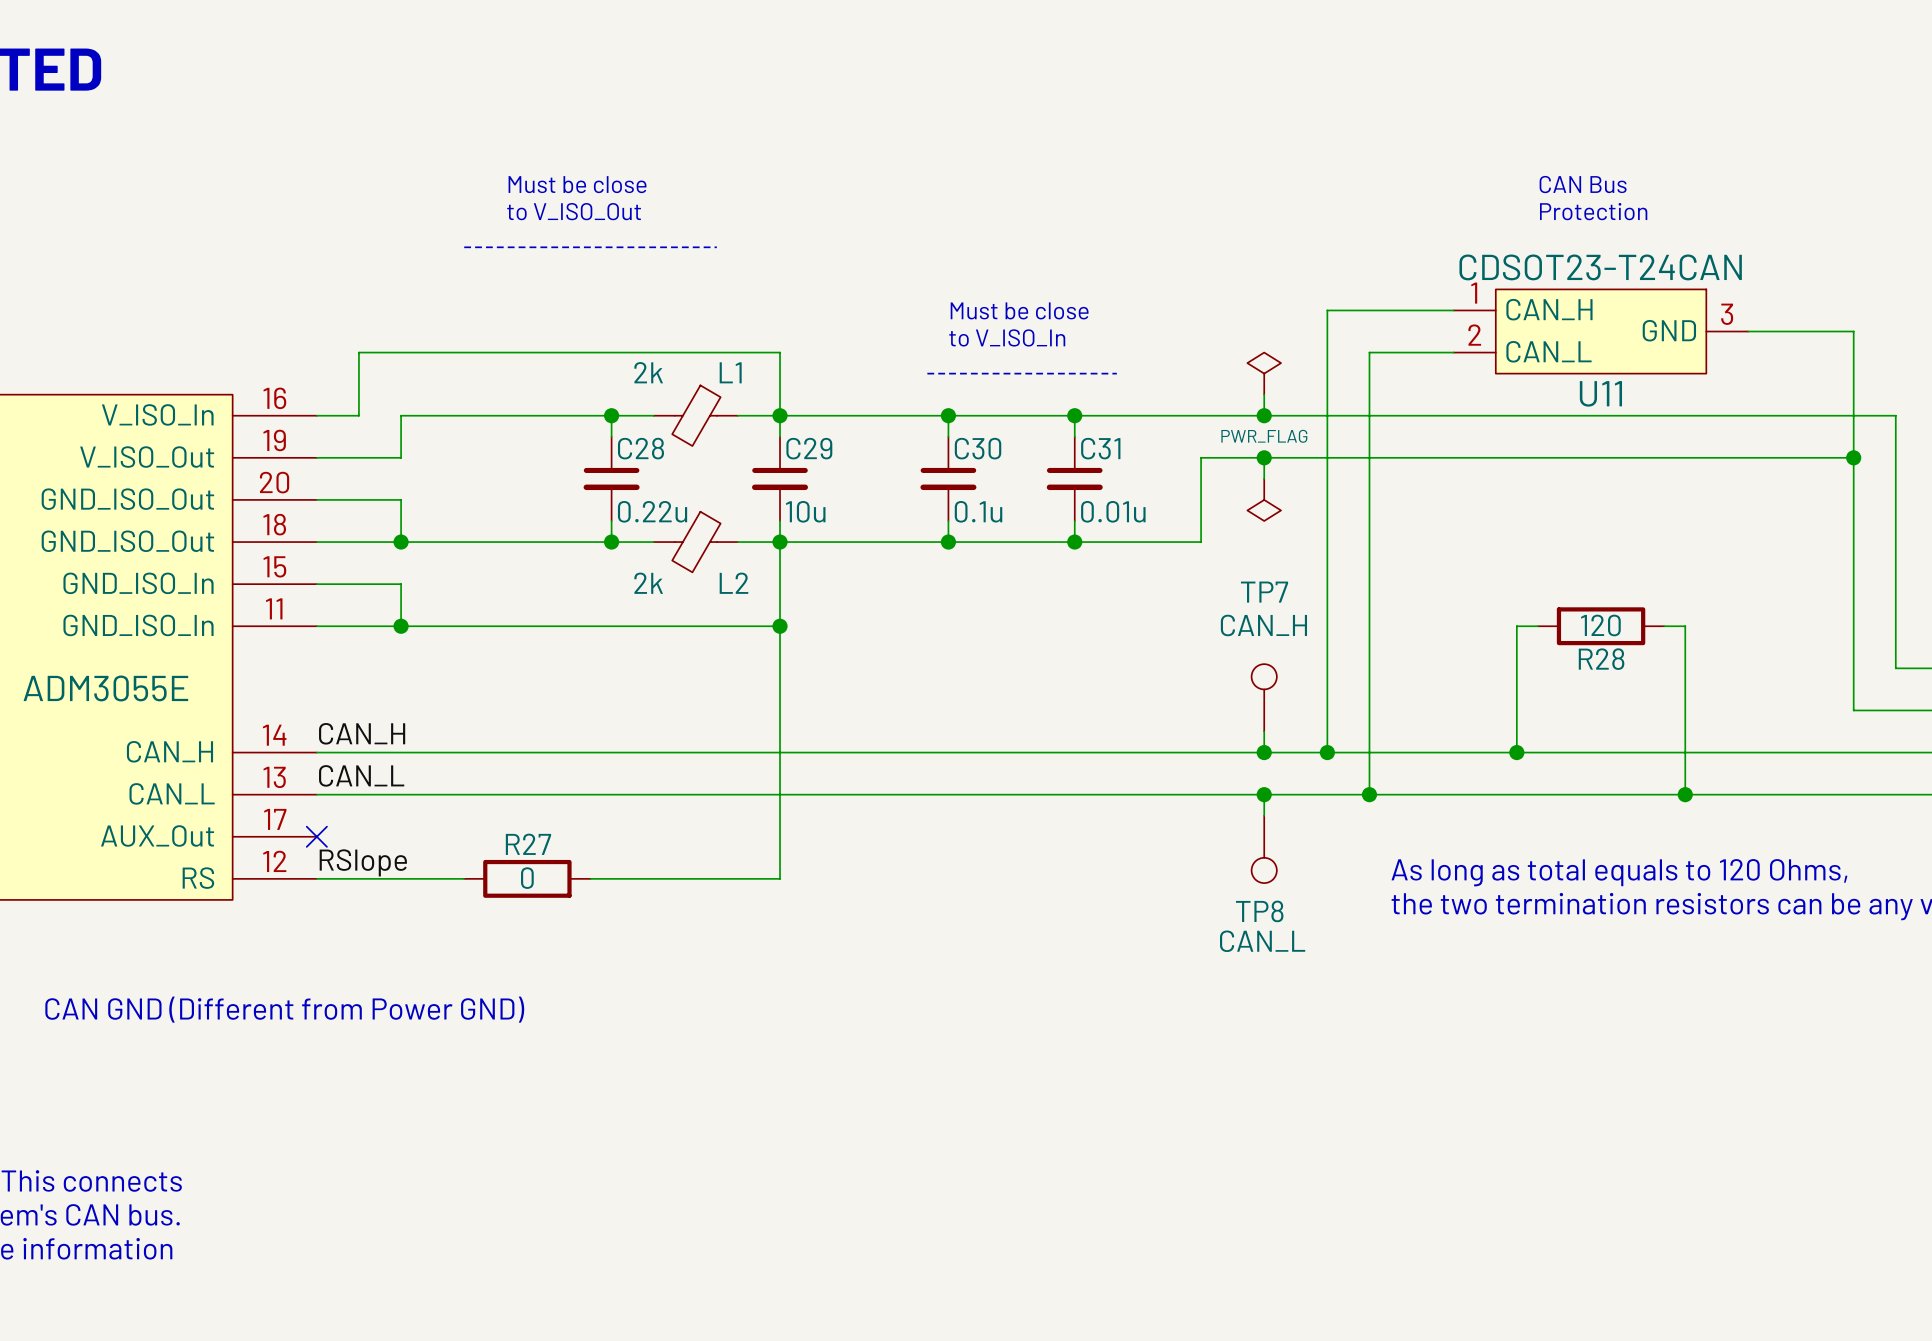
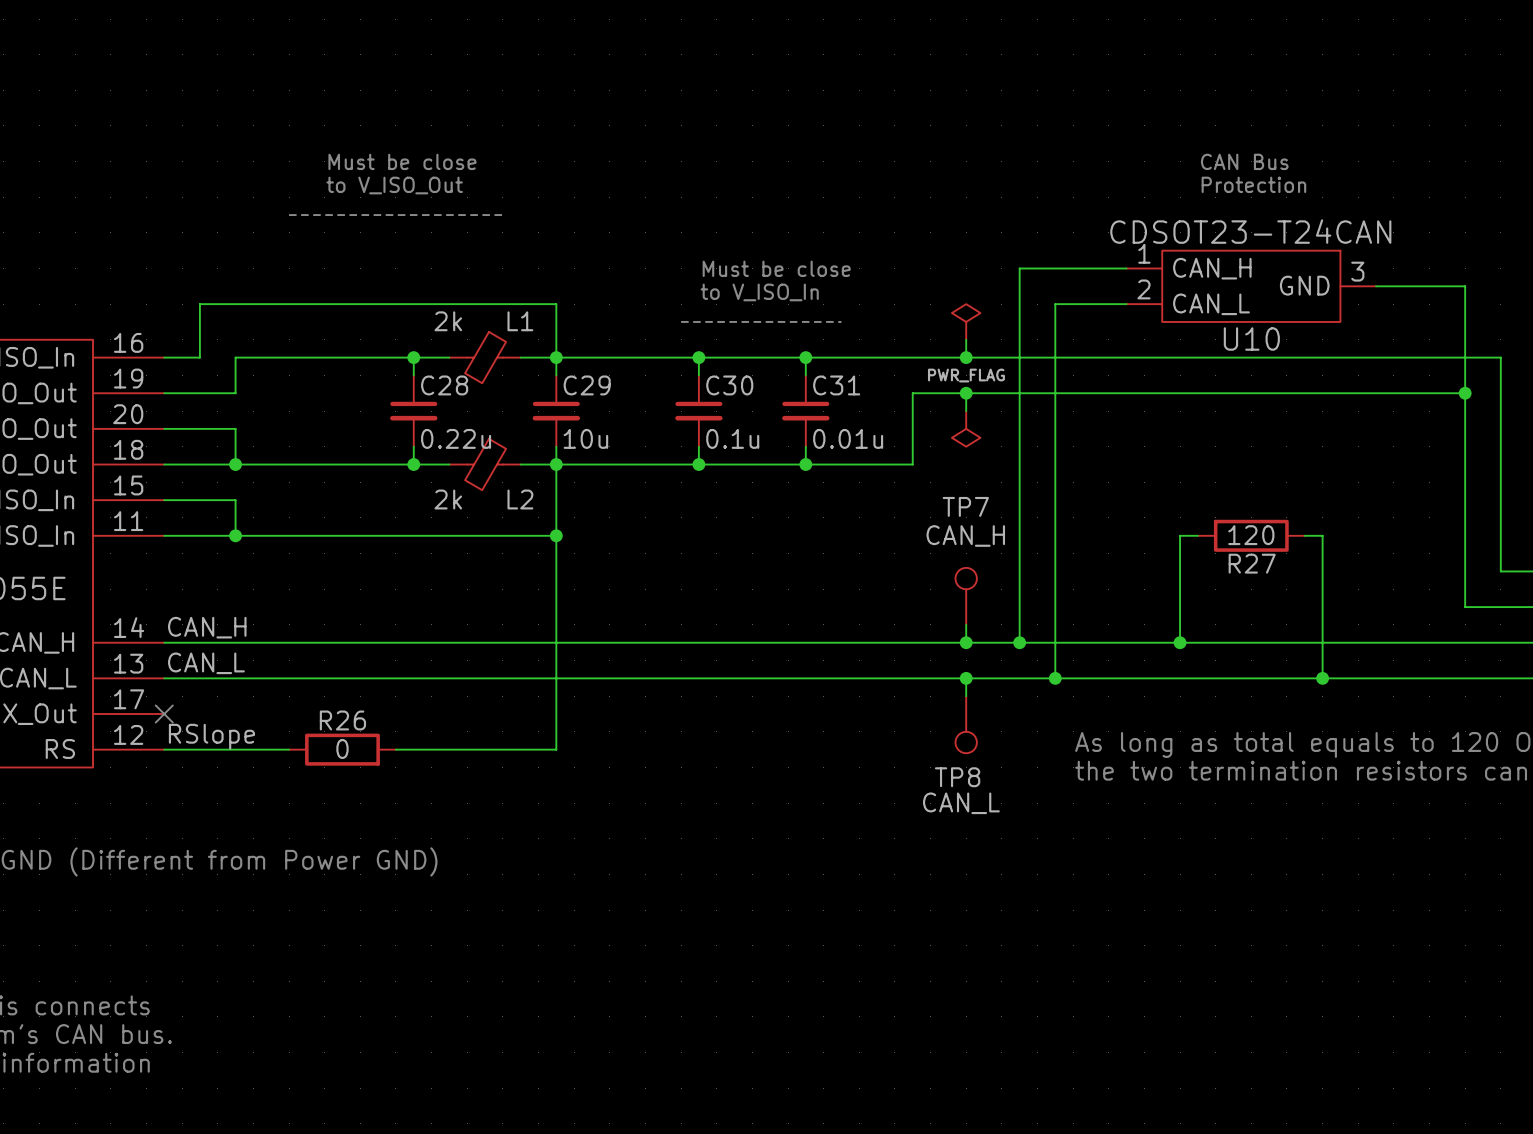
U11 name: U11 (1600, 393) -> U10 (1251, 338)
R28 name: R28 (1601, 659) -> R27 (1252, 563)
R27 name: R27 (528, 844) -> R26 (342, 720)

